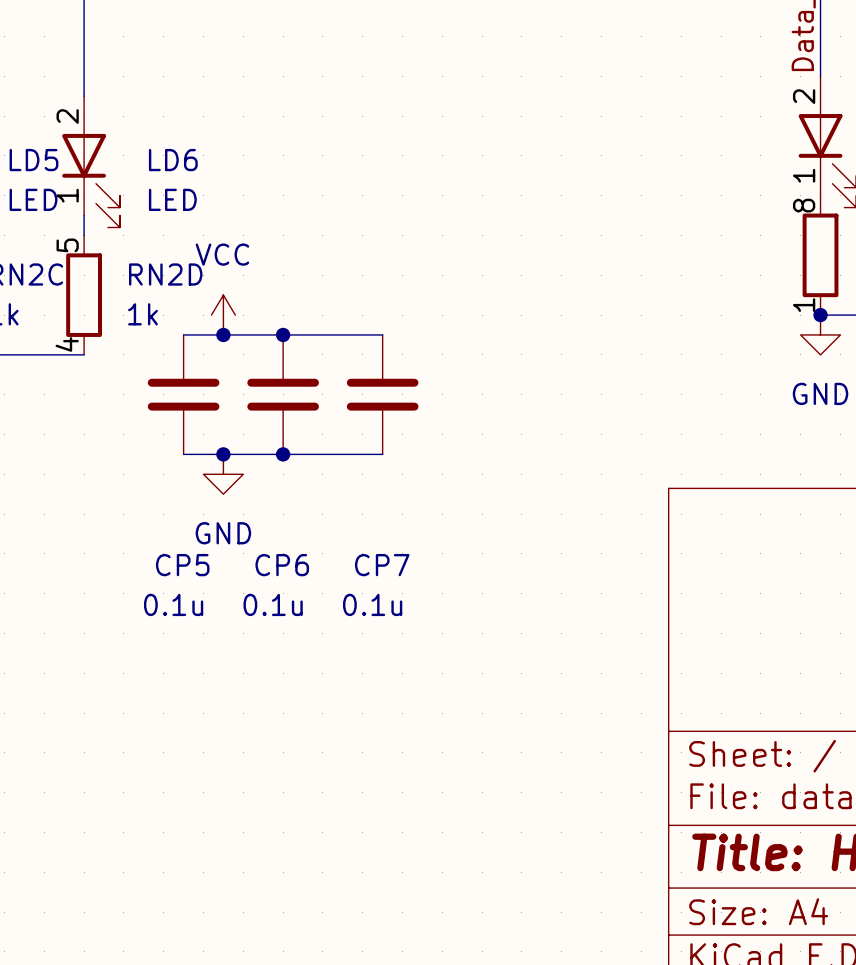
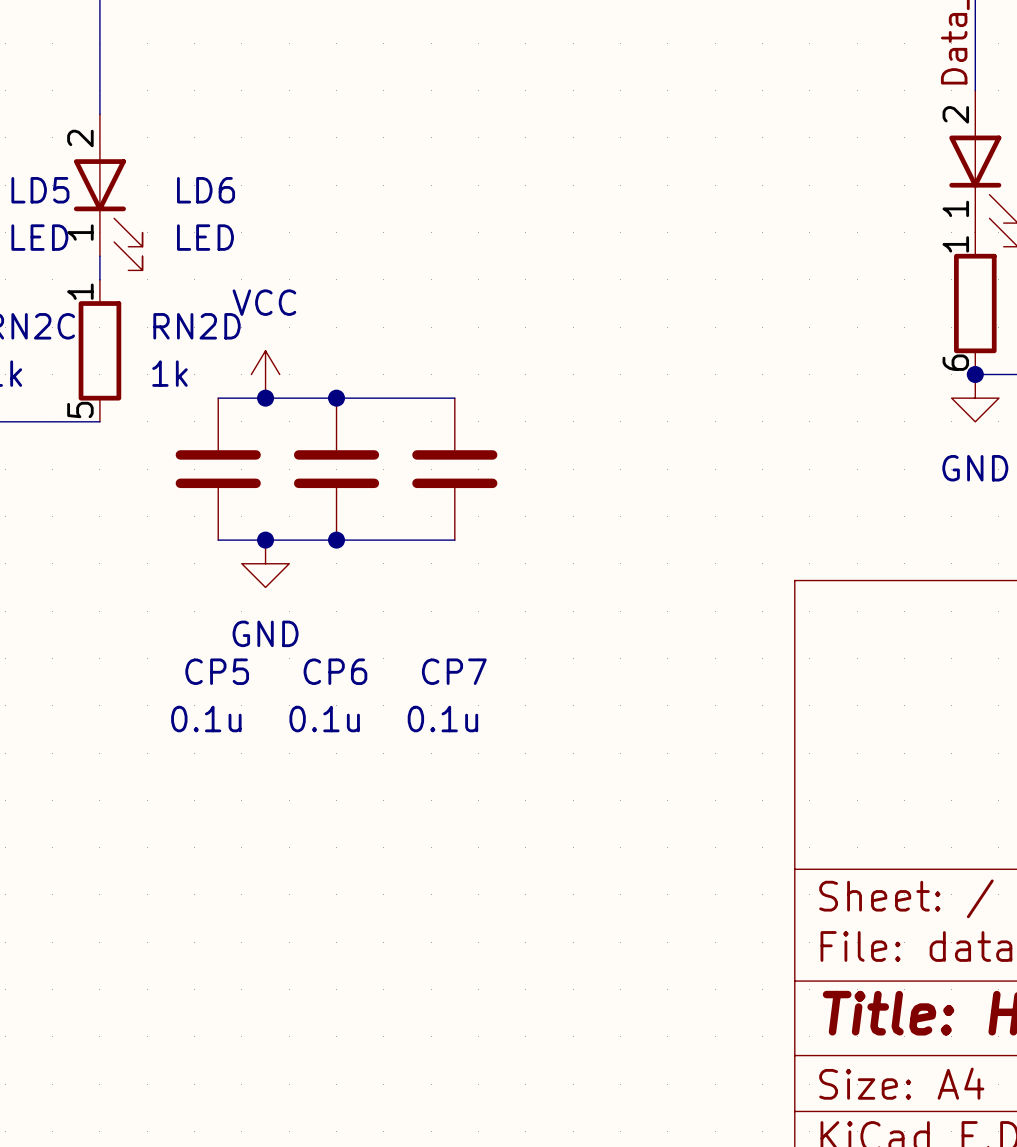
part pin number: 8 (804, 205) -> 1 (955, 244)
RN2D pin number: 5 (67, 245) -> 1 (80, 291)
part pin number: 1 (804, 305) -> 6 (955, 362)
RN2D pin number: 4 (67, 344) -> 5 (80, 409)

